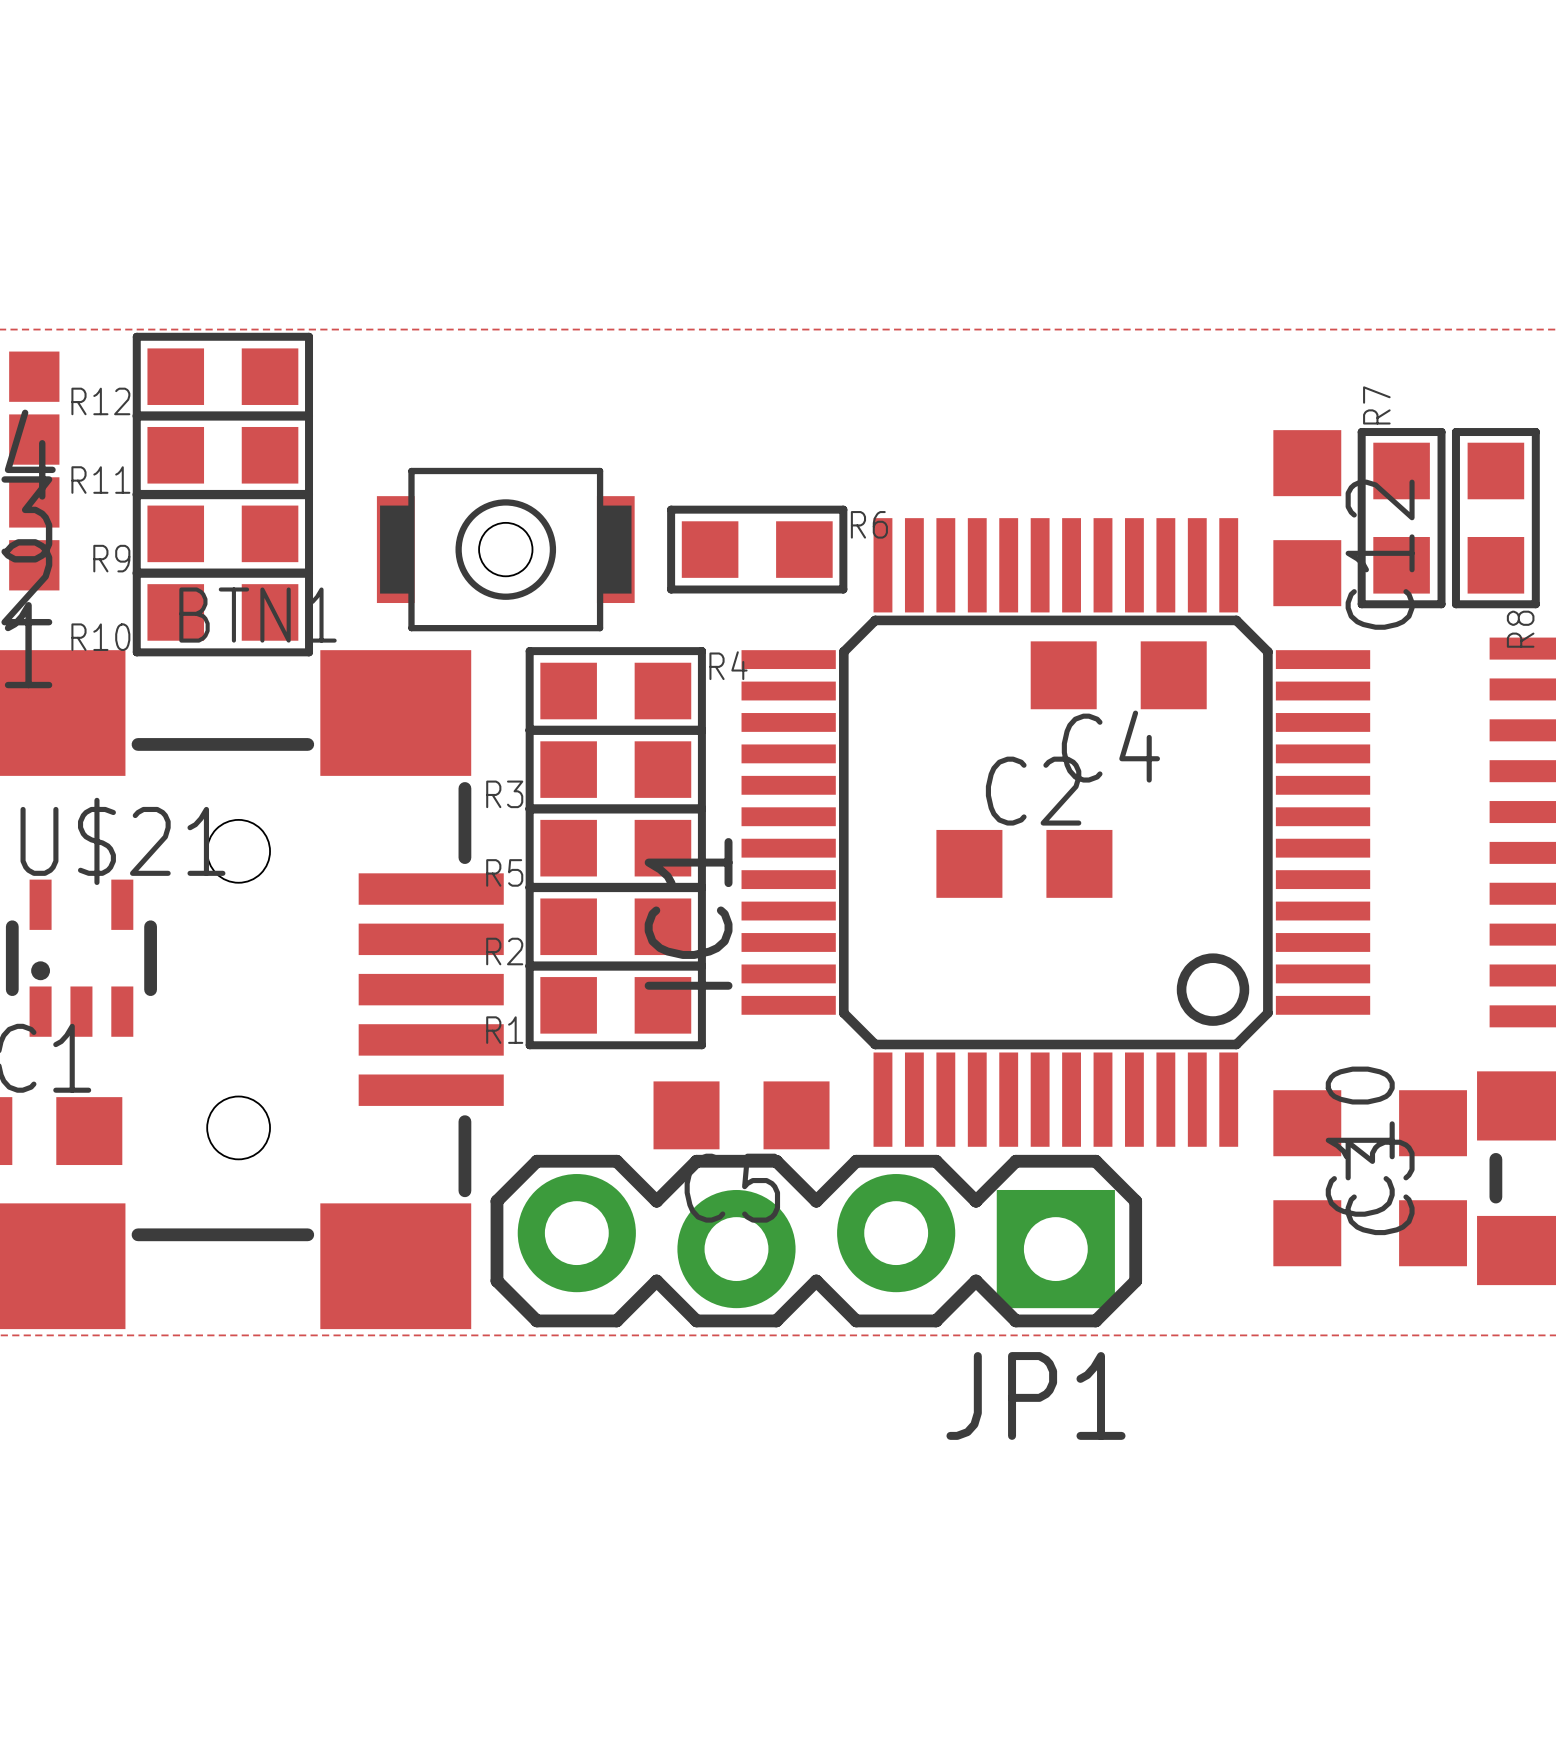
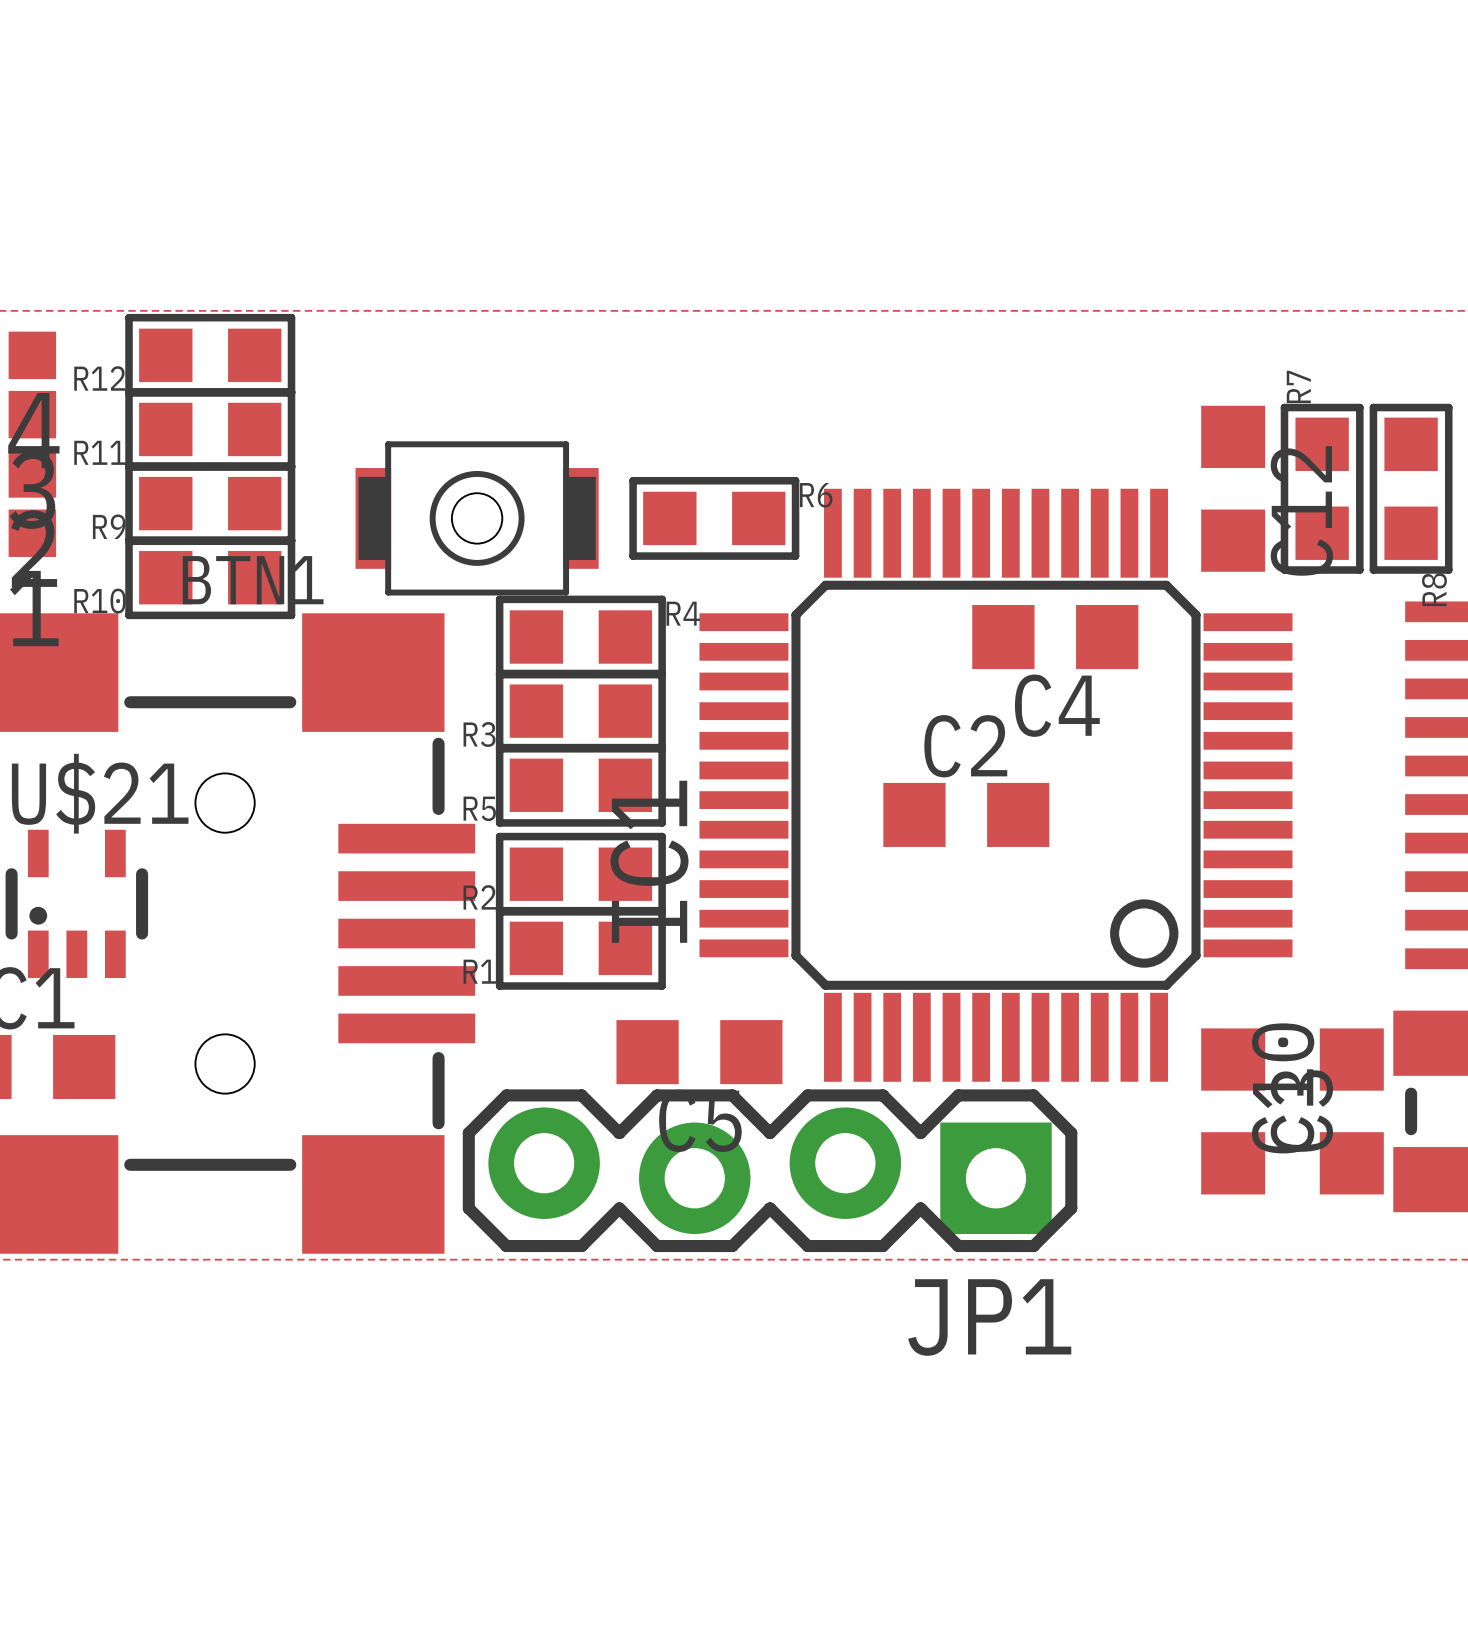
R4 position: (615, 691) -> (580, 637)
R3 position: (615, 769) -> (580, 711)
R5 position: (615, 848) -> (580, 785)

